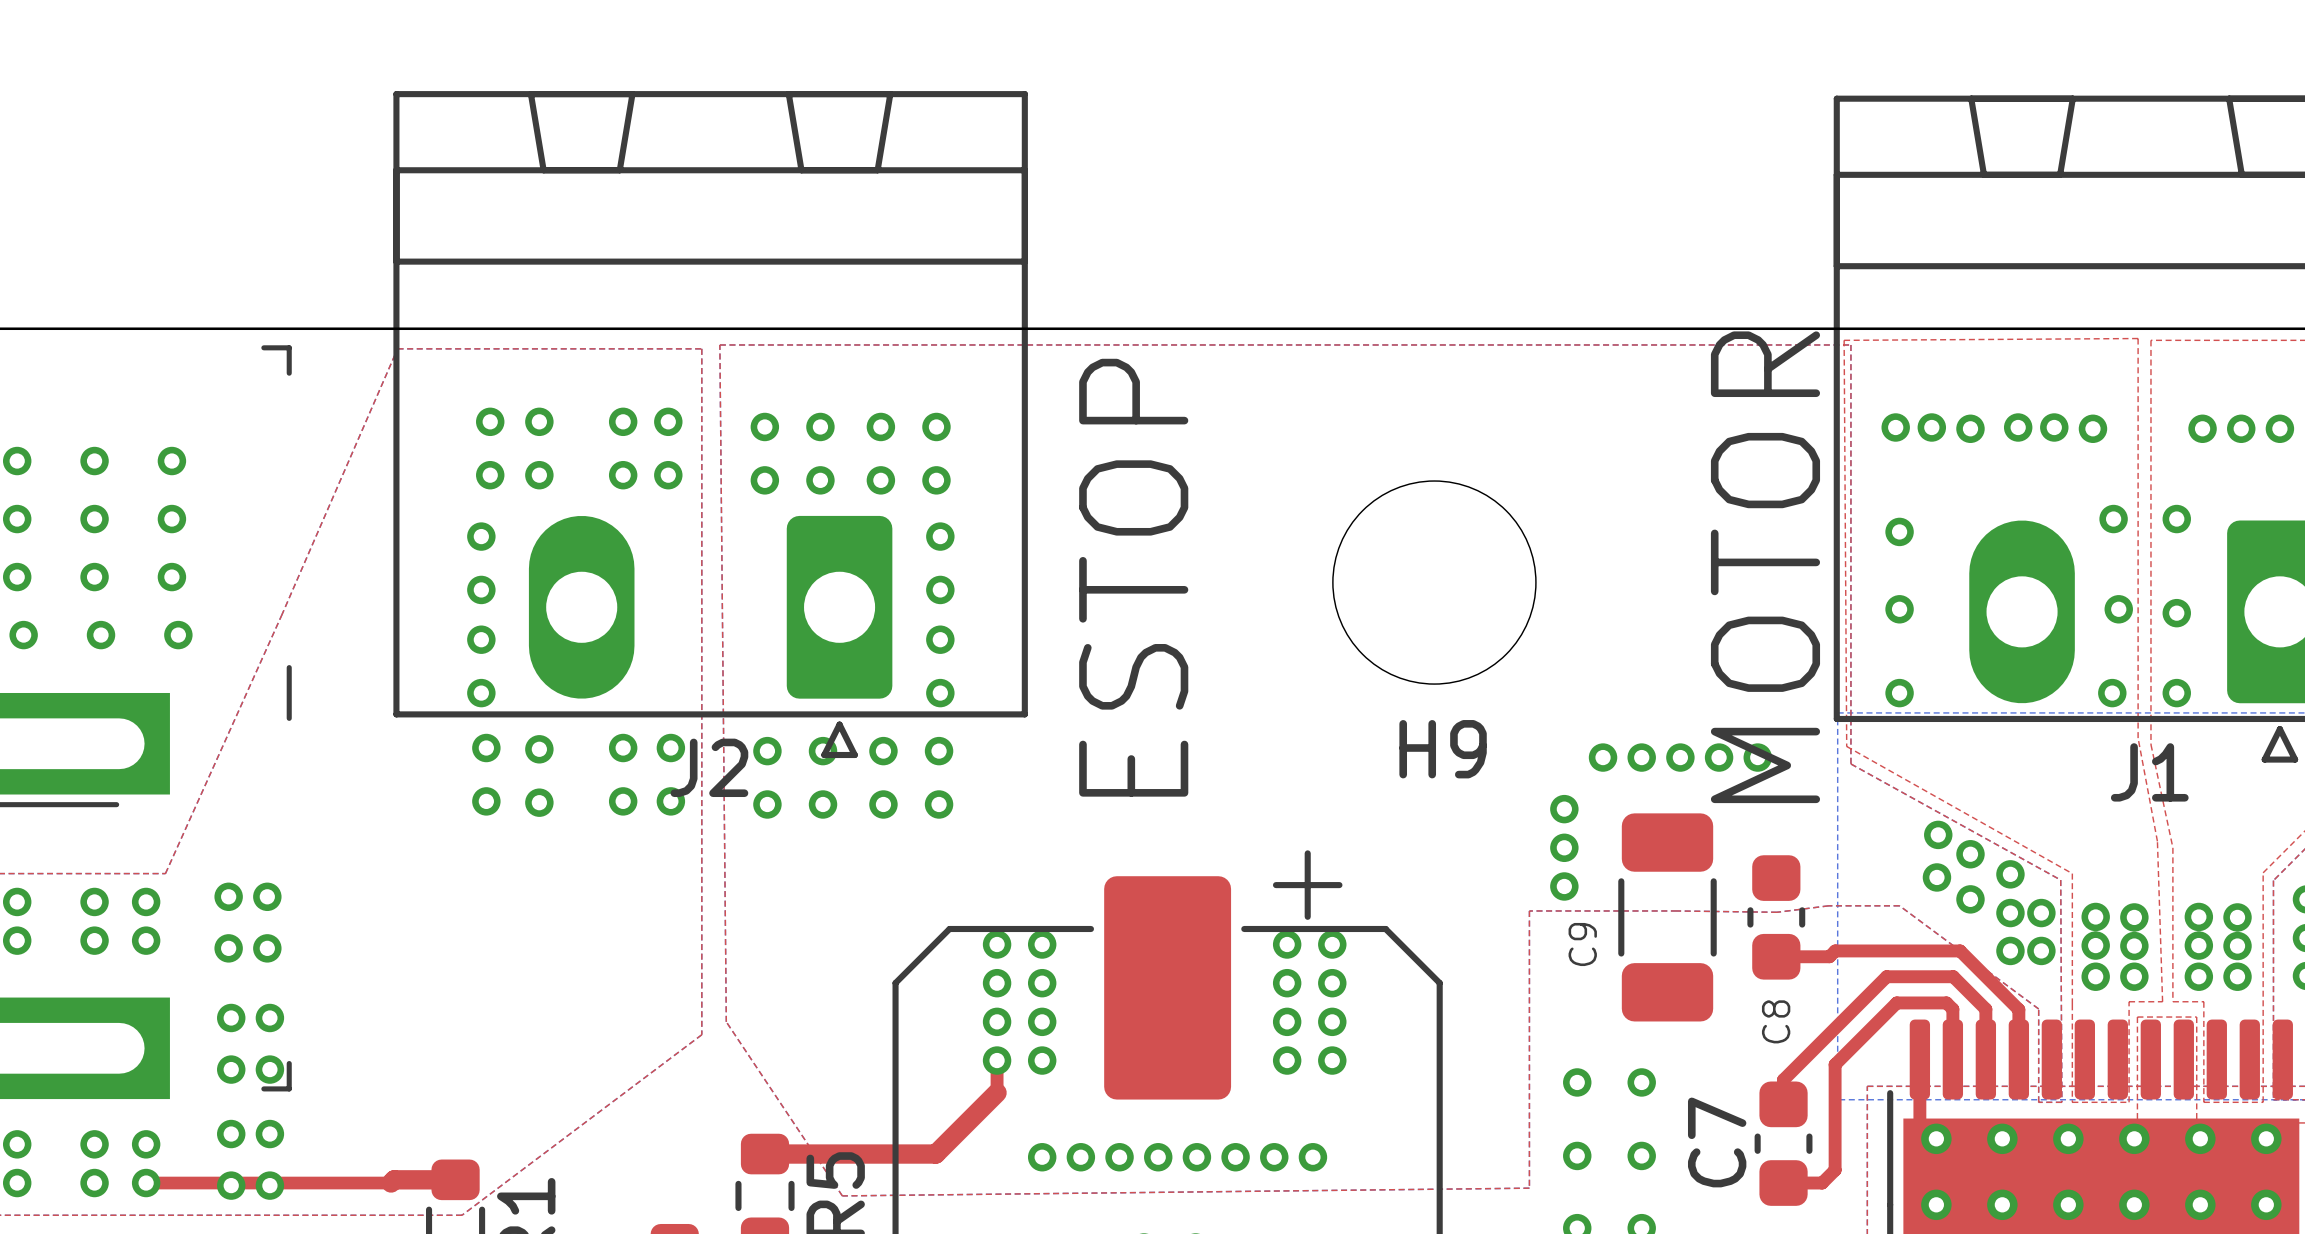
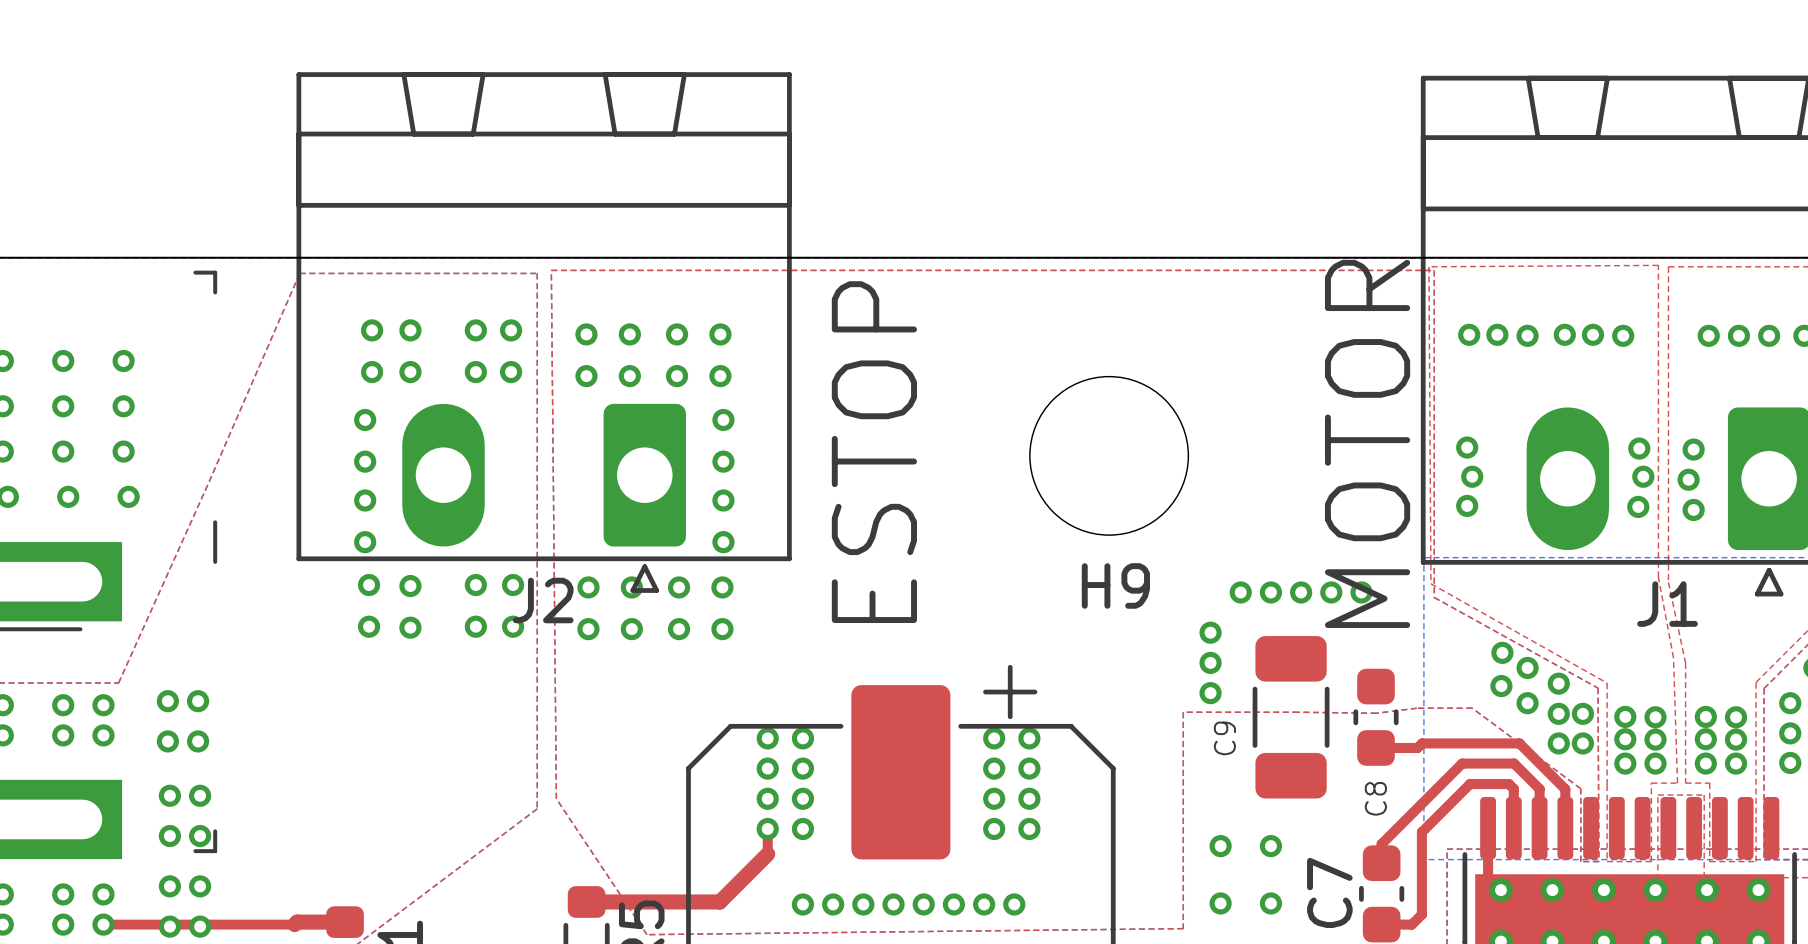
via: (2113, 519) -> none
via: (2176, 519) -> none
via position: (1899, 531) -> (1467, 447)
via: none -> (1639, 448)
via: none -> (1693, 449)
via: none -> (1638, 506)
via: none -> (1693, 509)
via position: (1899, 693) -> (1467, 505)
via: (2112, 693) -> none
via: (2176, 693) -> none

